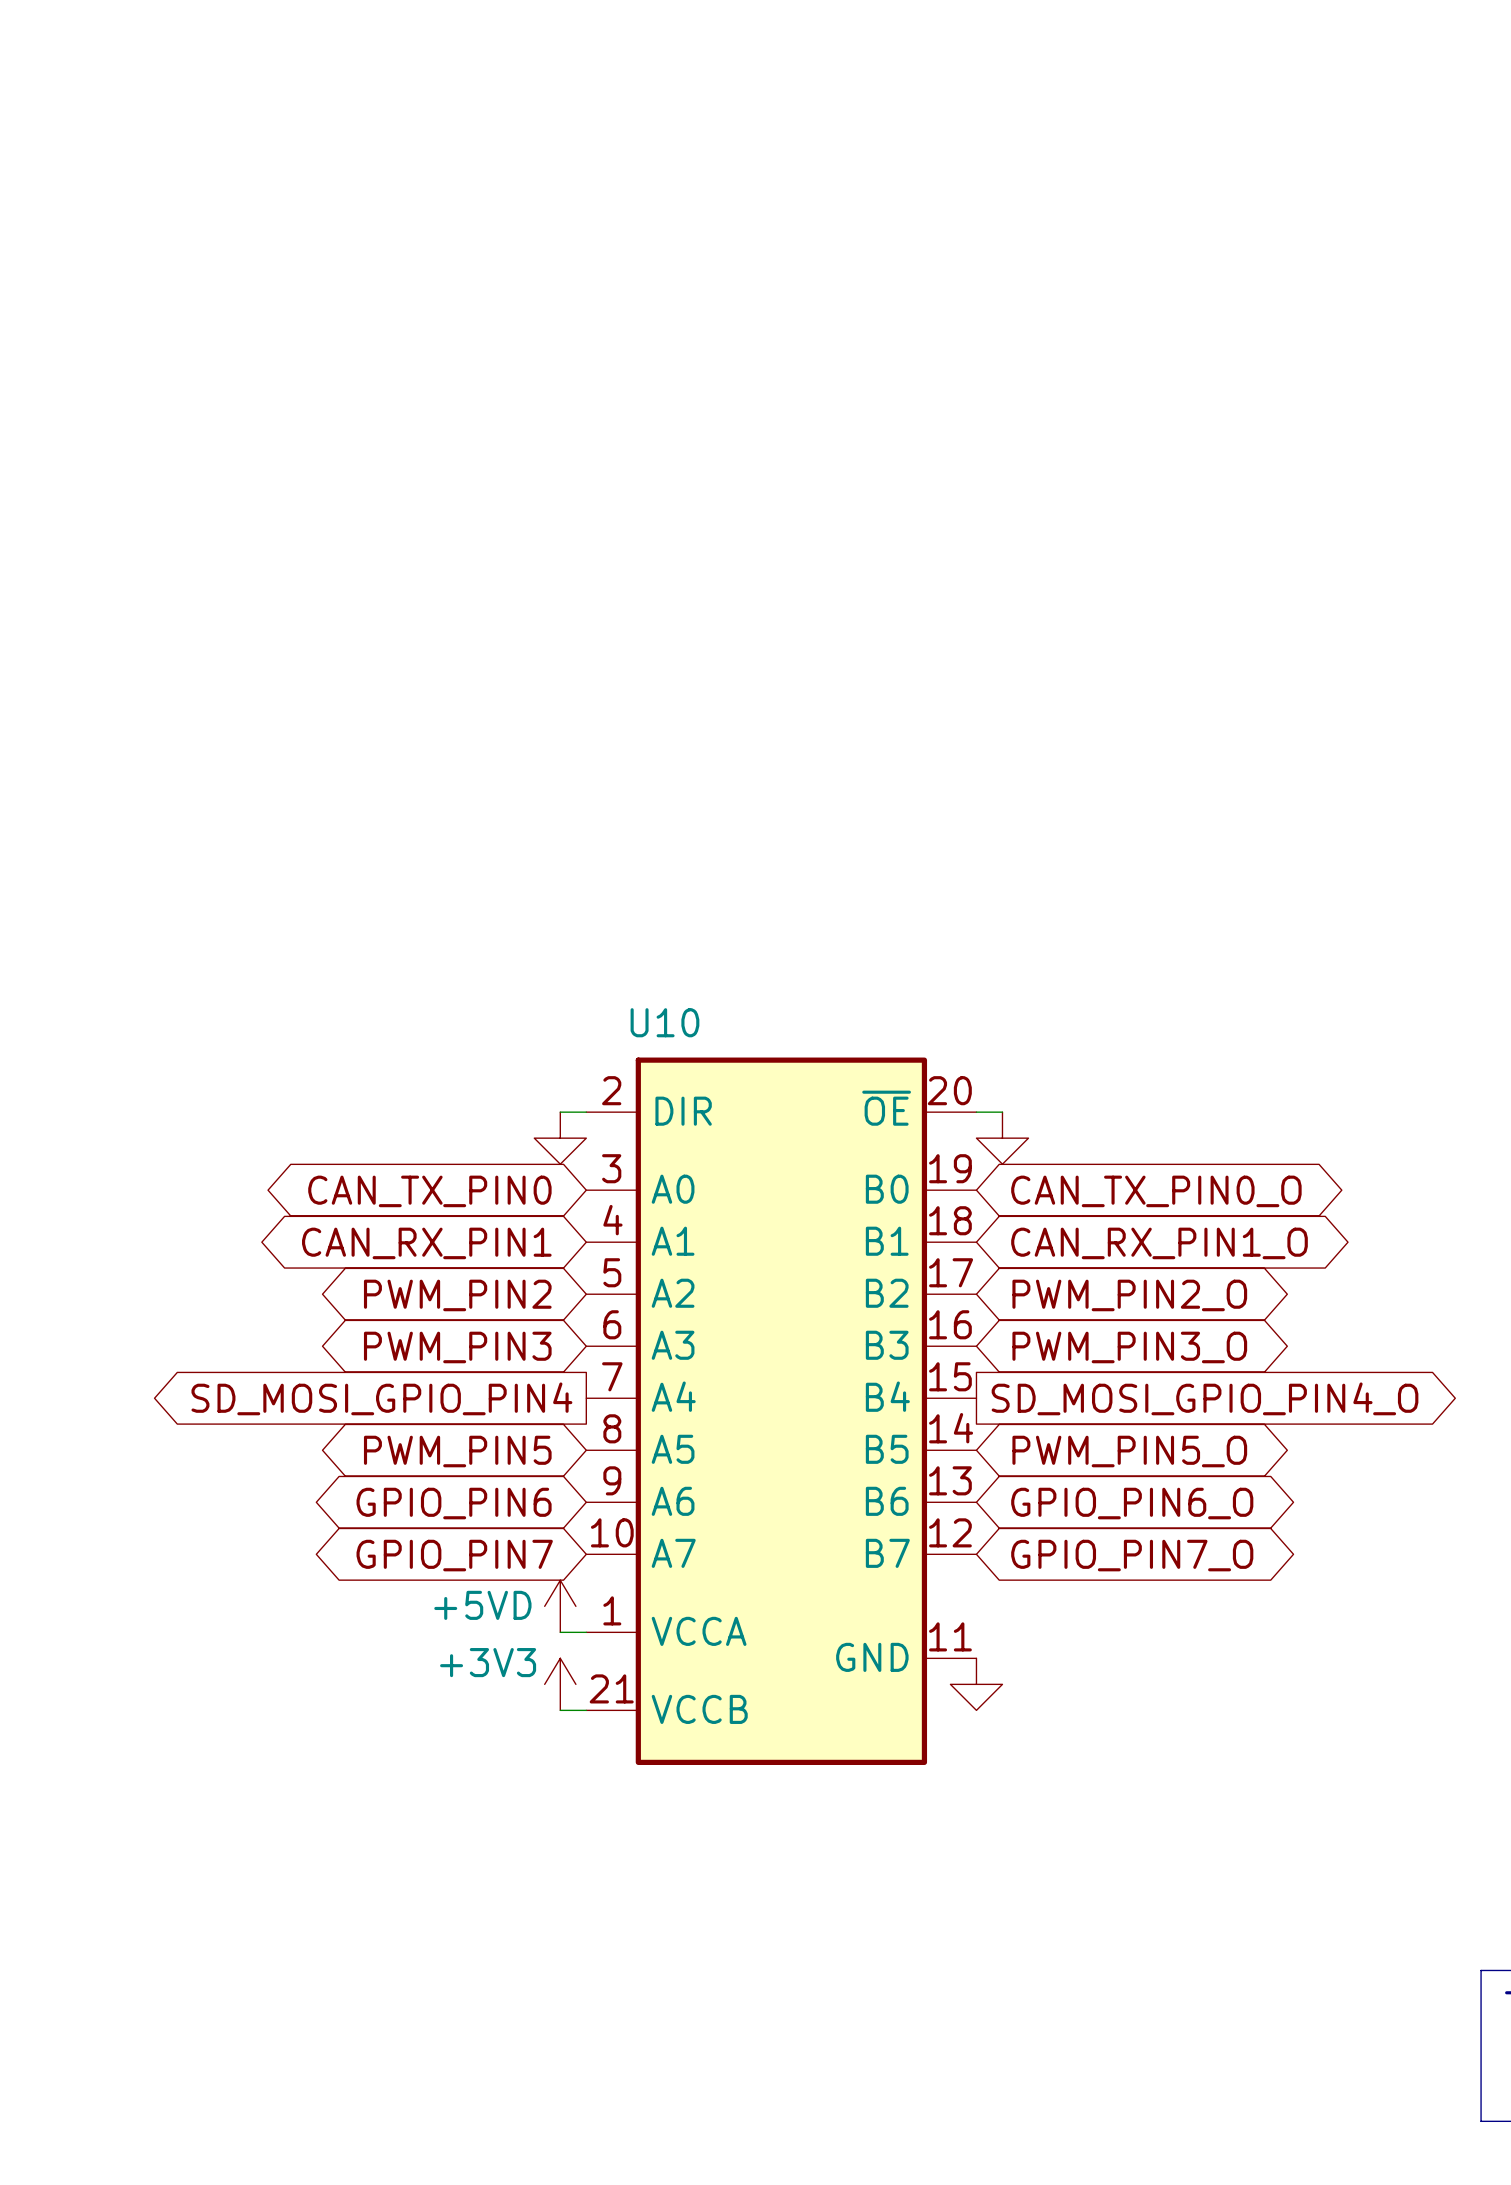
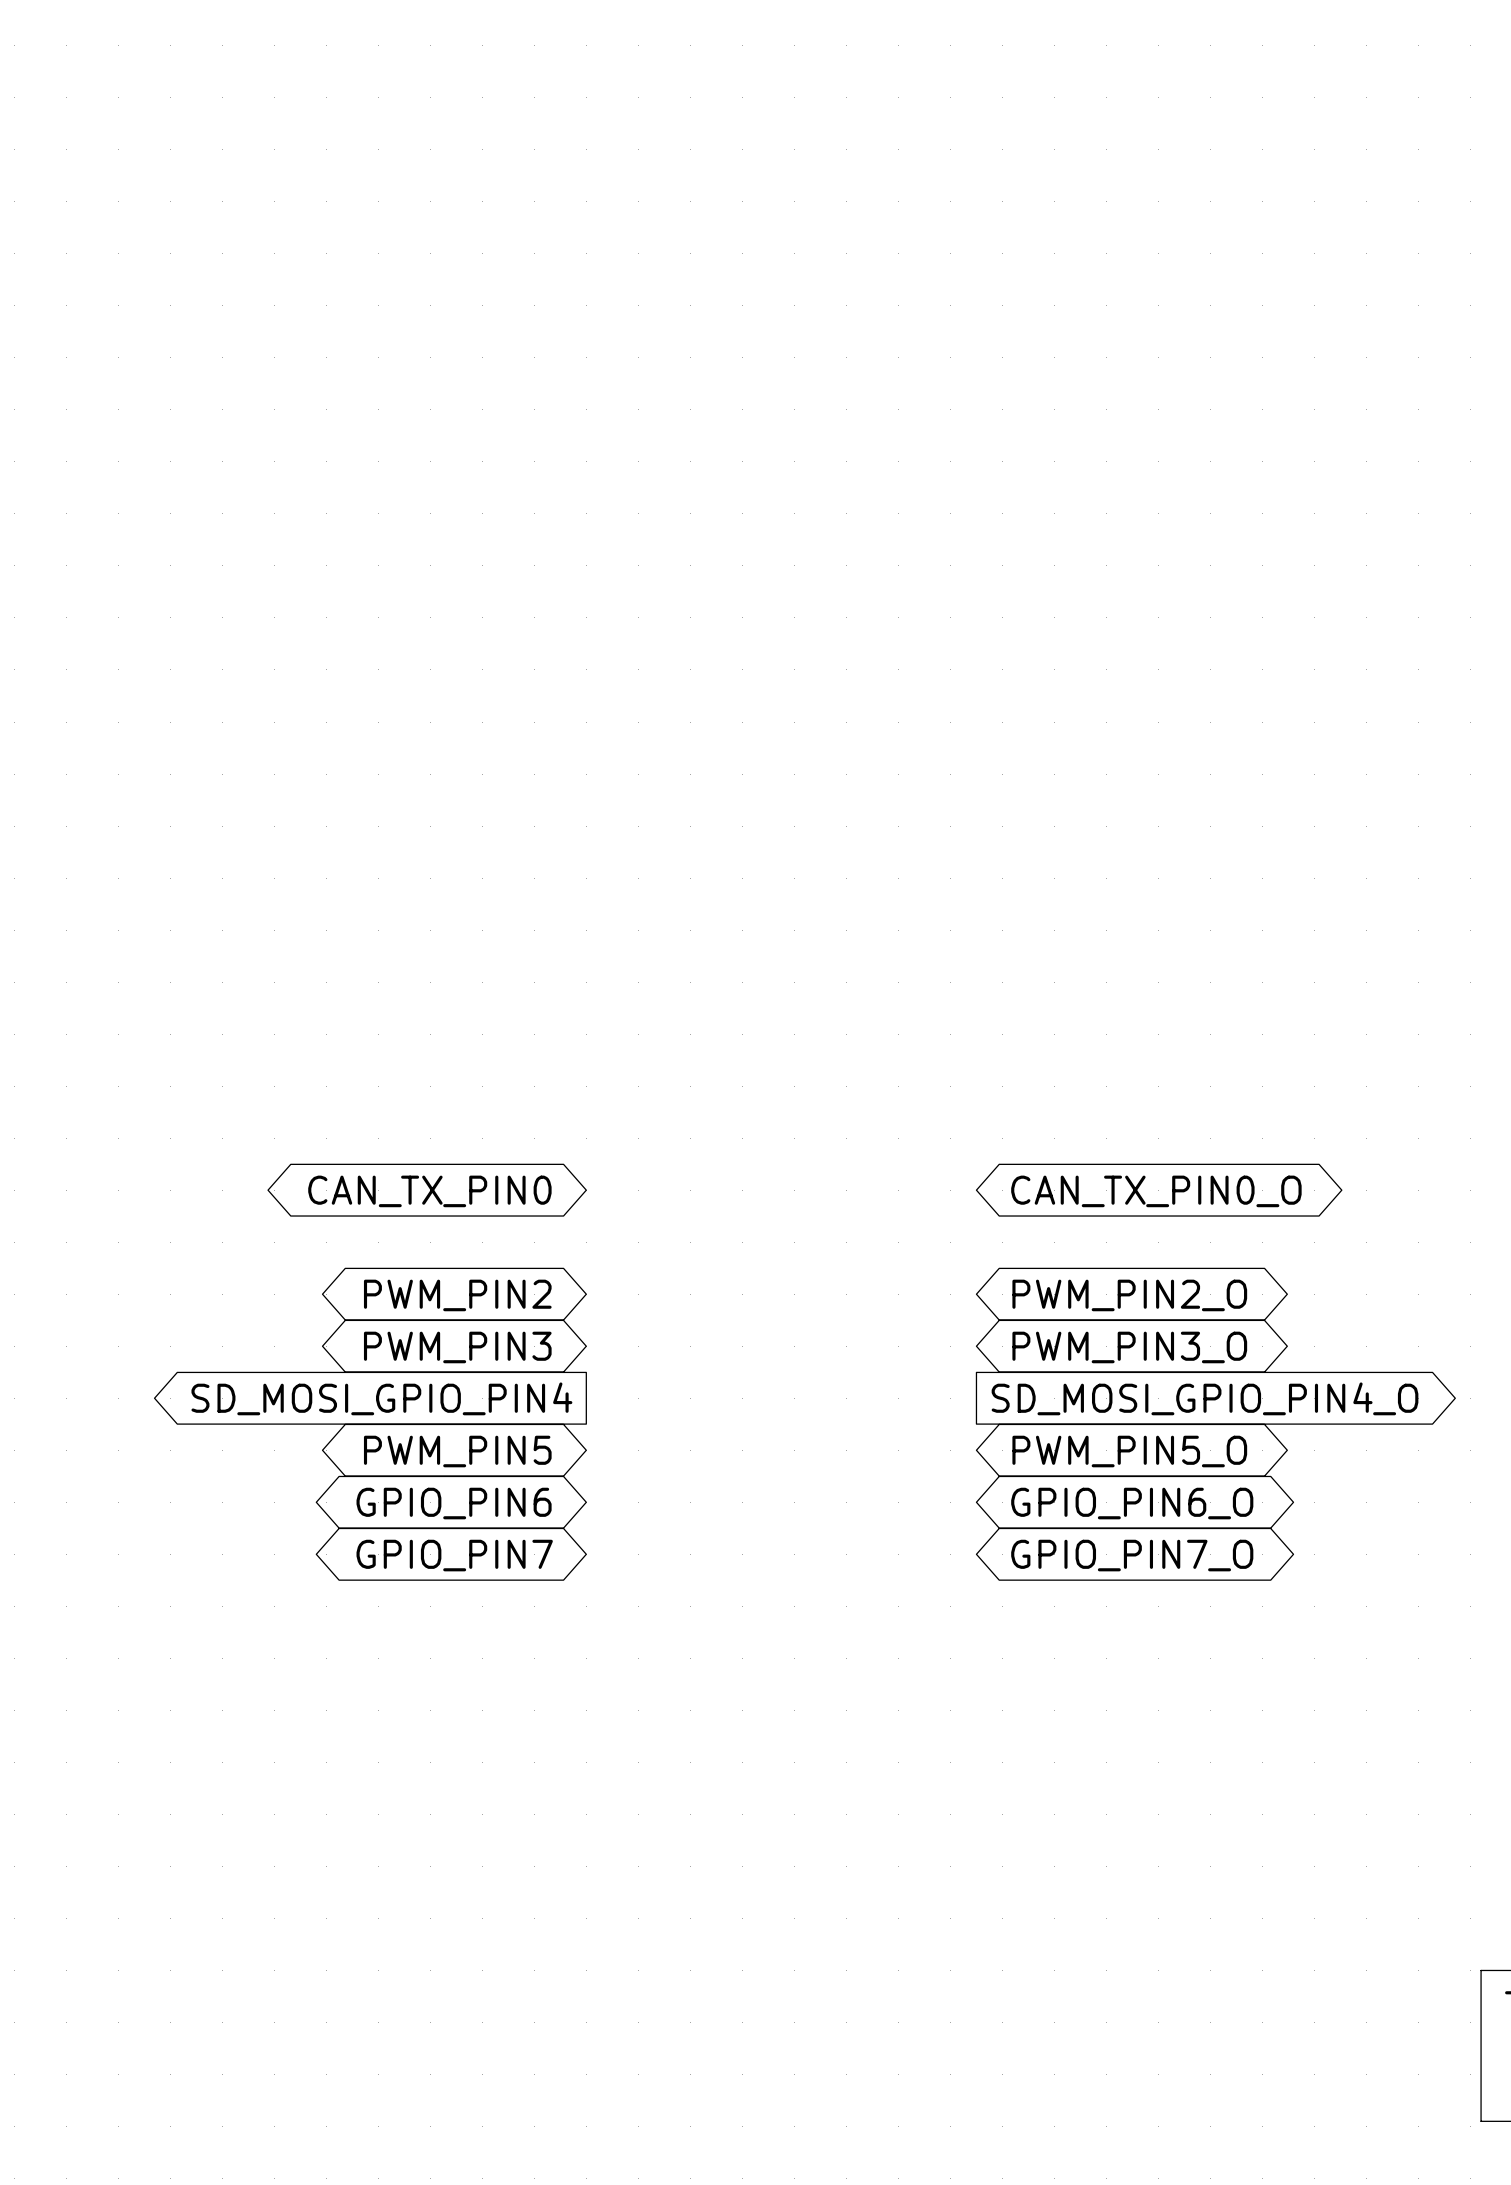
wire: (560, 1112) (586, 1112) -> none
wire: (976, 1112) (1002, 1112) -> none
power symbol: (560, 1138) -> none
power symbol: (1002, 1138) -> none
global label: CAN_RX_PIN1 (426, 1243) -> none
global label: CAN_RX_PIN1_O (1159, 1243) -> none
U10: (781, 1411) -> none
power symbol: +5VD (560, 1606) -> none
wire: (560, 1632) (586, 1632) -> none
power symbol: +3V3 (560, 1684) -> none
power symbol: (976, 1684) -> none
wire: (560, 1710) (586, 1710) -> none

